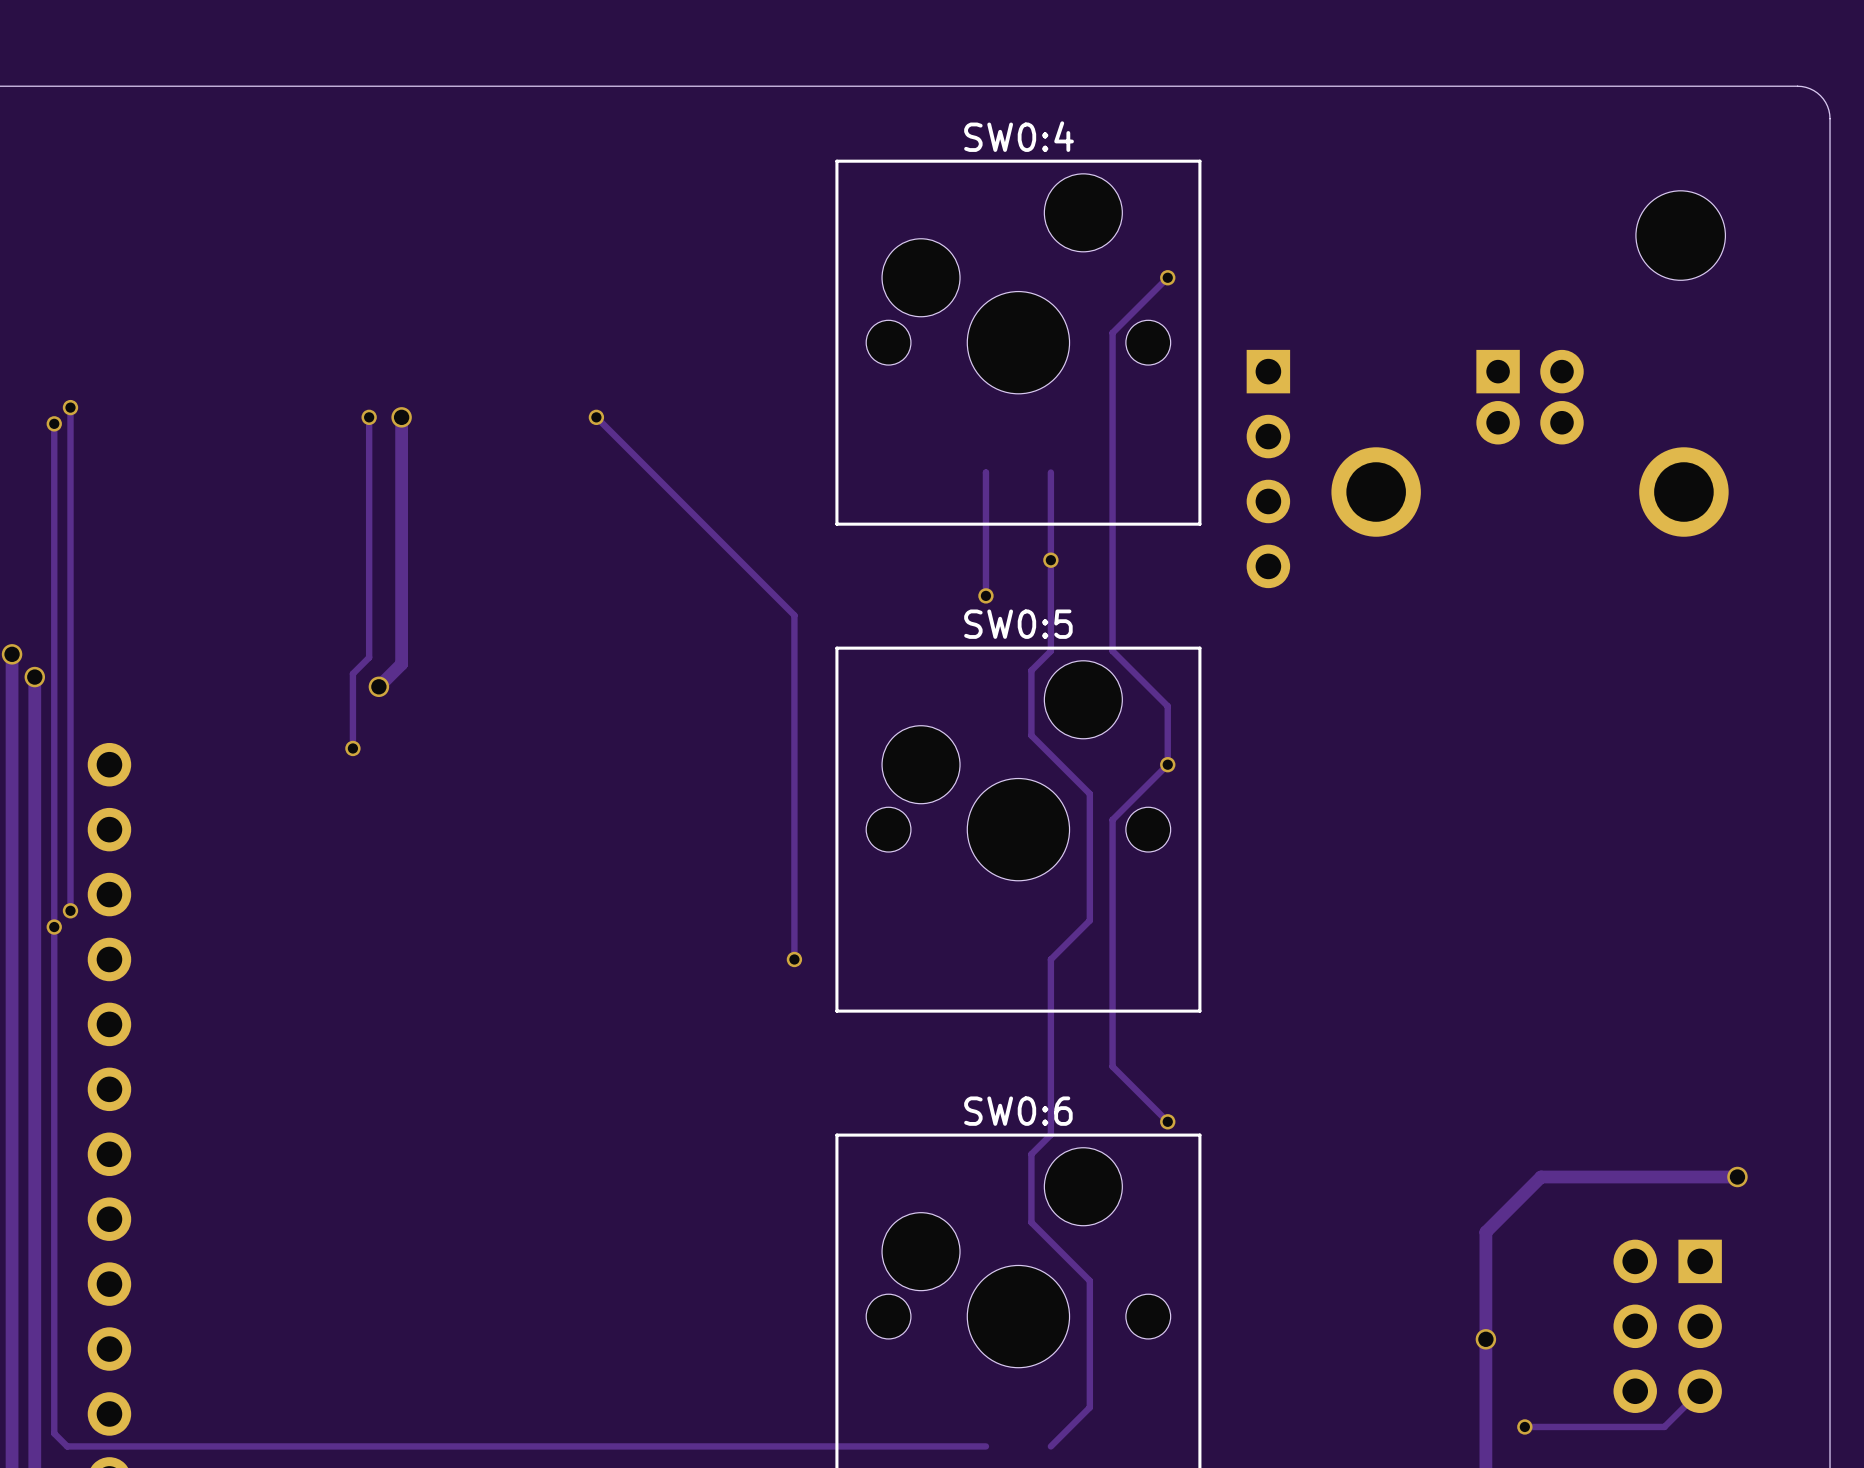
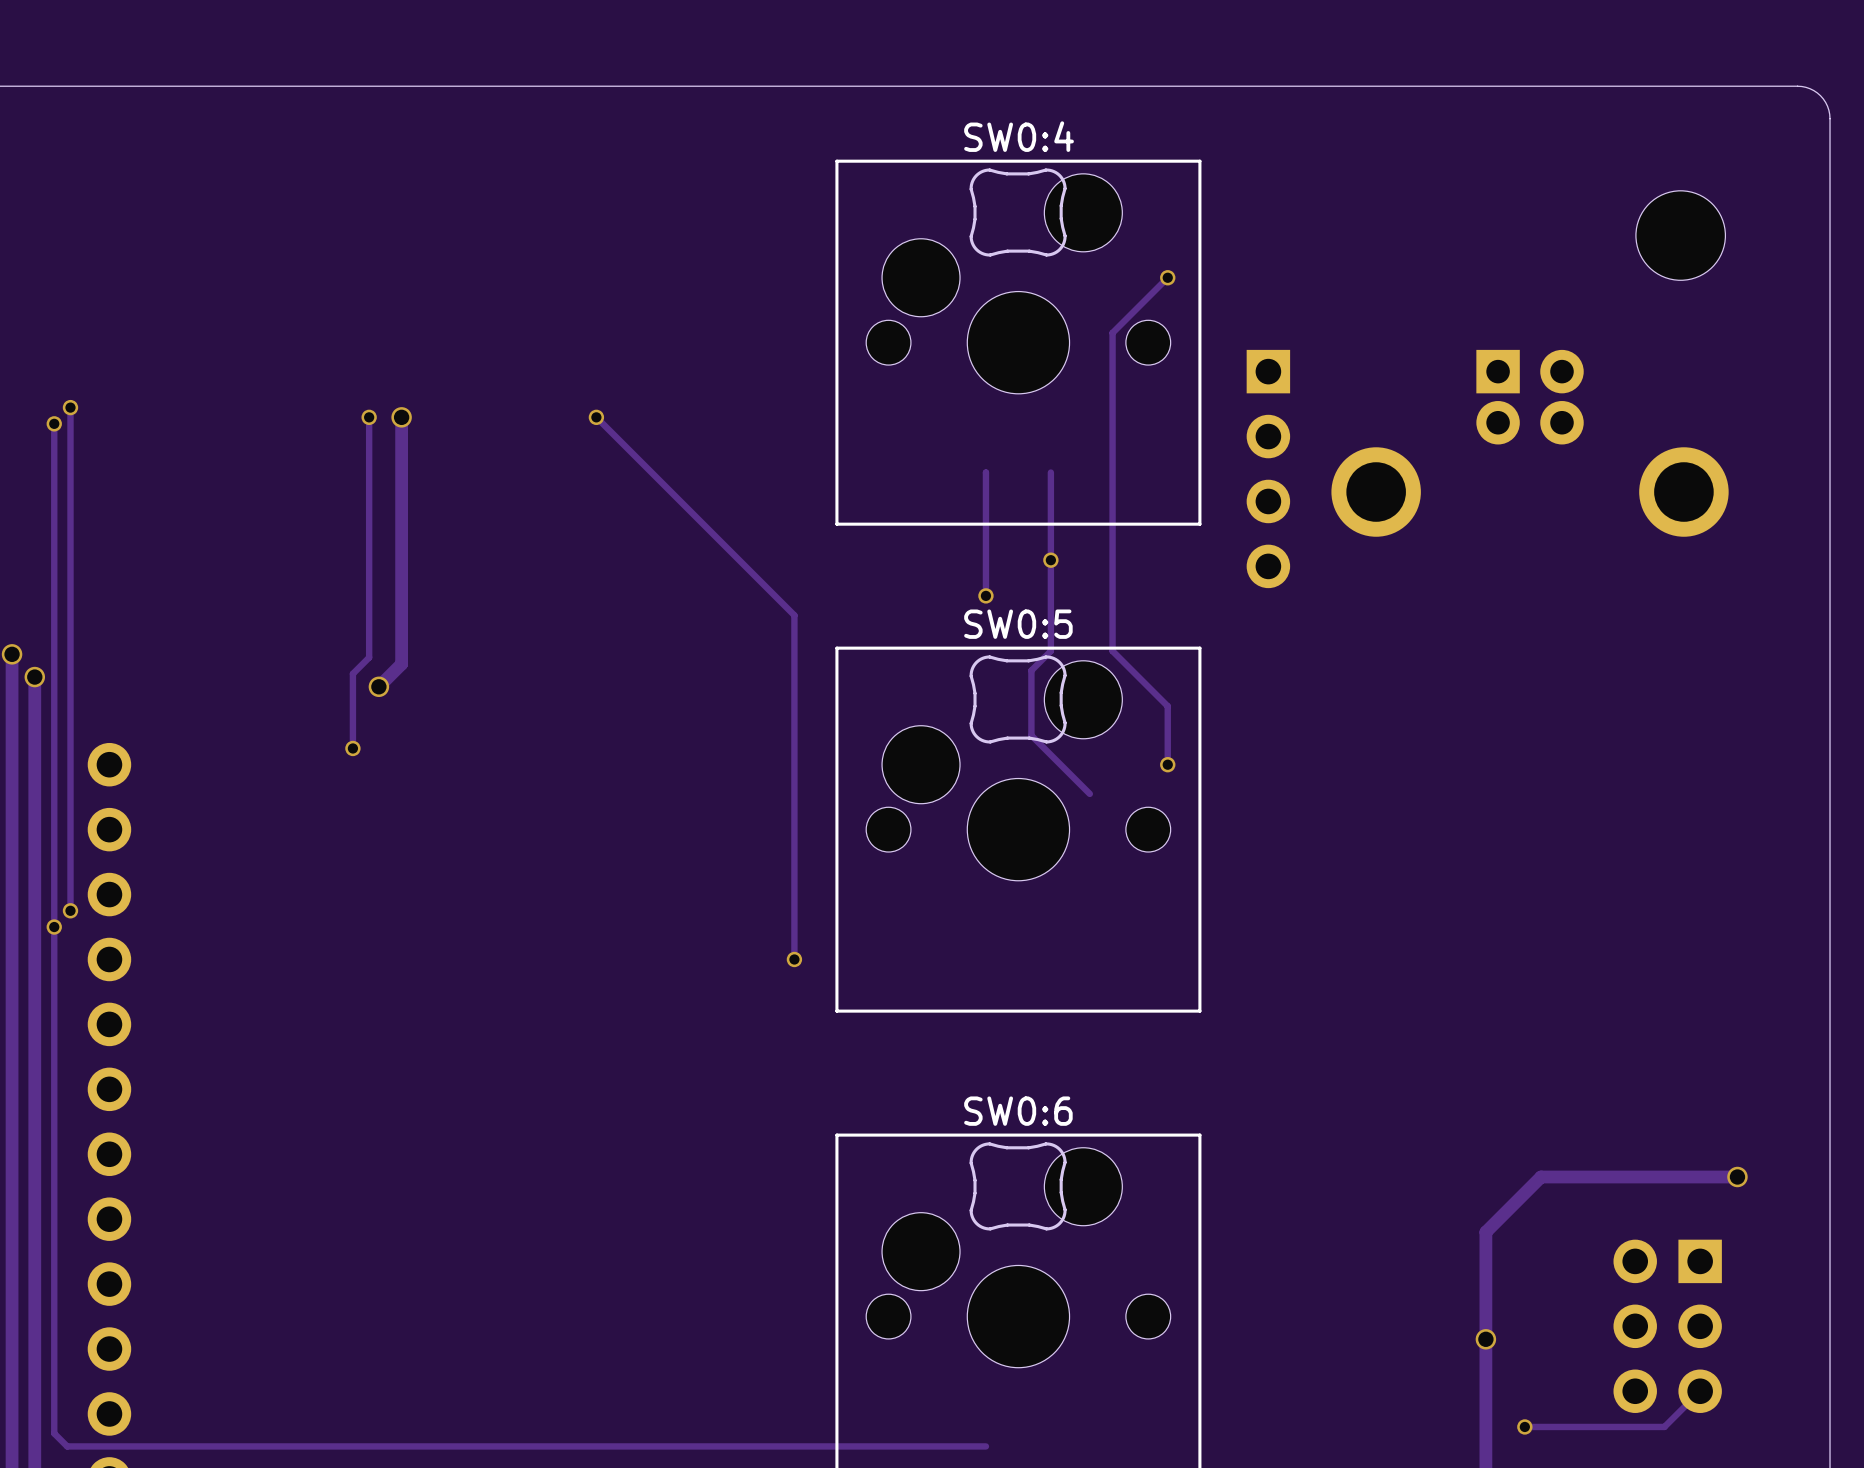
part: none -> (1018, 212)
part: none -> (1018, 699)
track: (1167, 764) (1112, 819) (1112, 1066) (1167, 1121) -> none
track: (1089, 793) (1089, 920) (1050, 959) (1050, 1134) (1031, 1154) (1031, 1222) (1089, 1280) (1089, 1407) (1050, 1446) -> none
via: (1167, 1121) -> none
part: none -> (1018, 1186)

